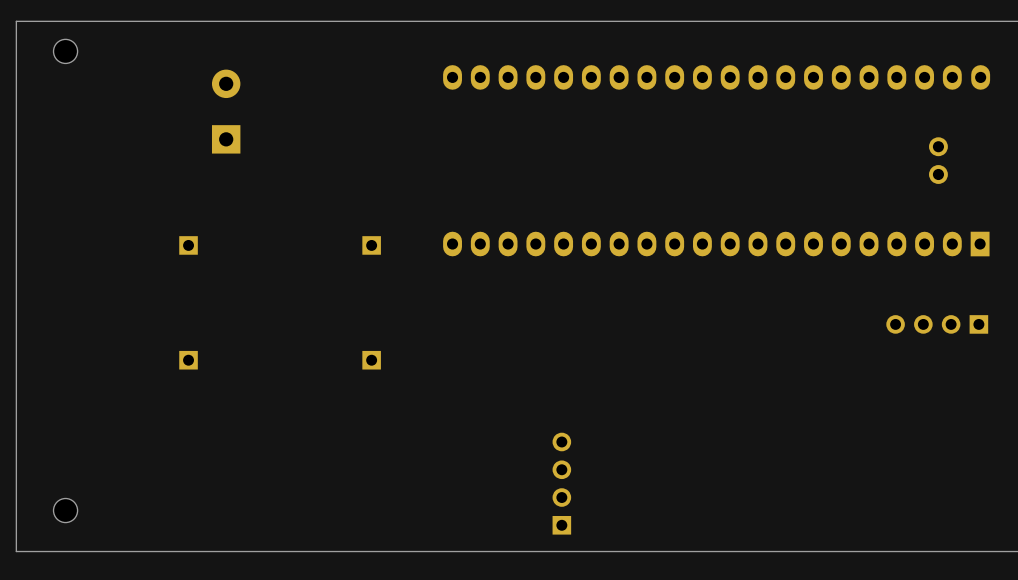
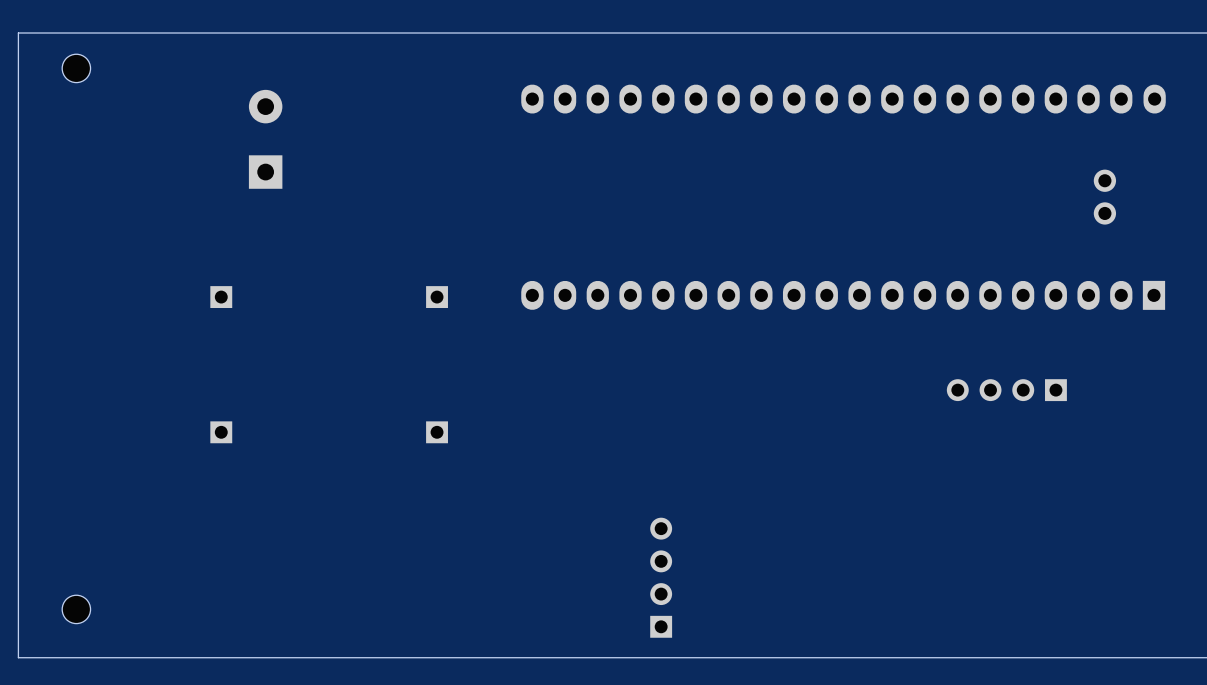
part position: (937, 324) -> (1006, 390)

